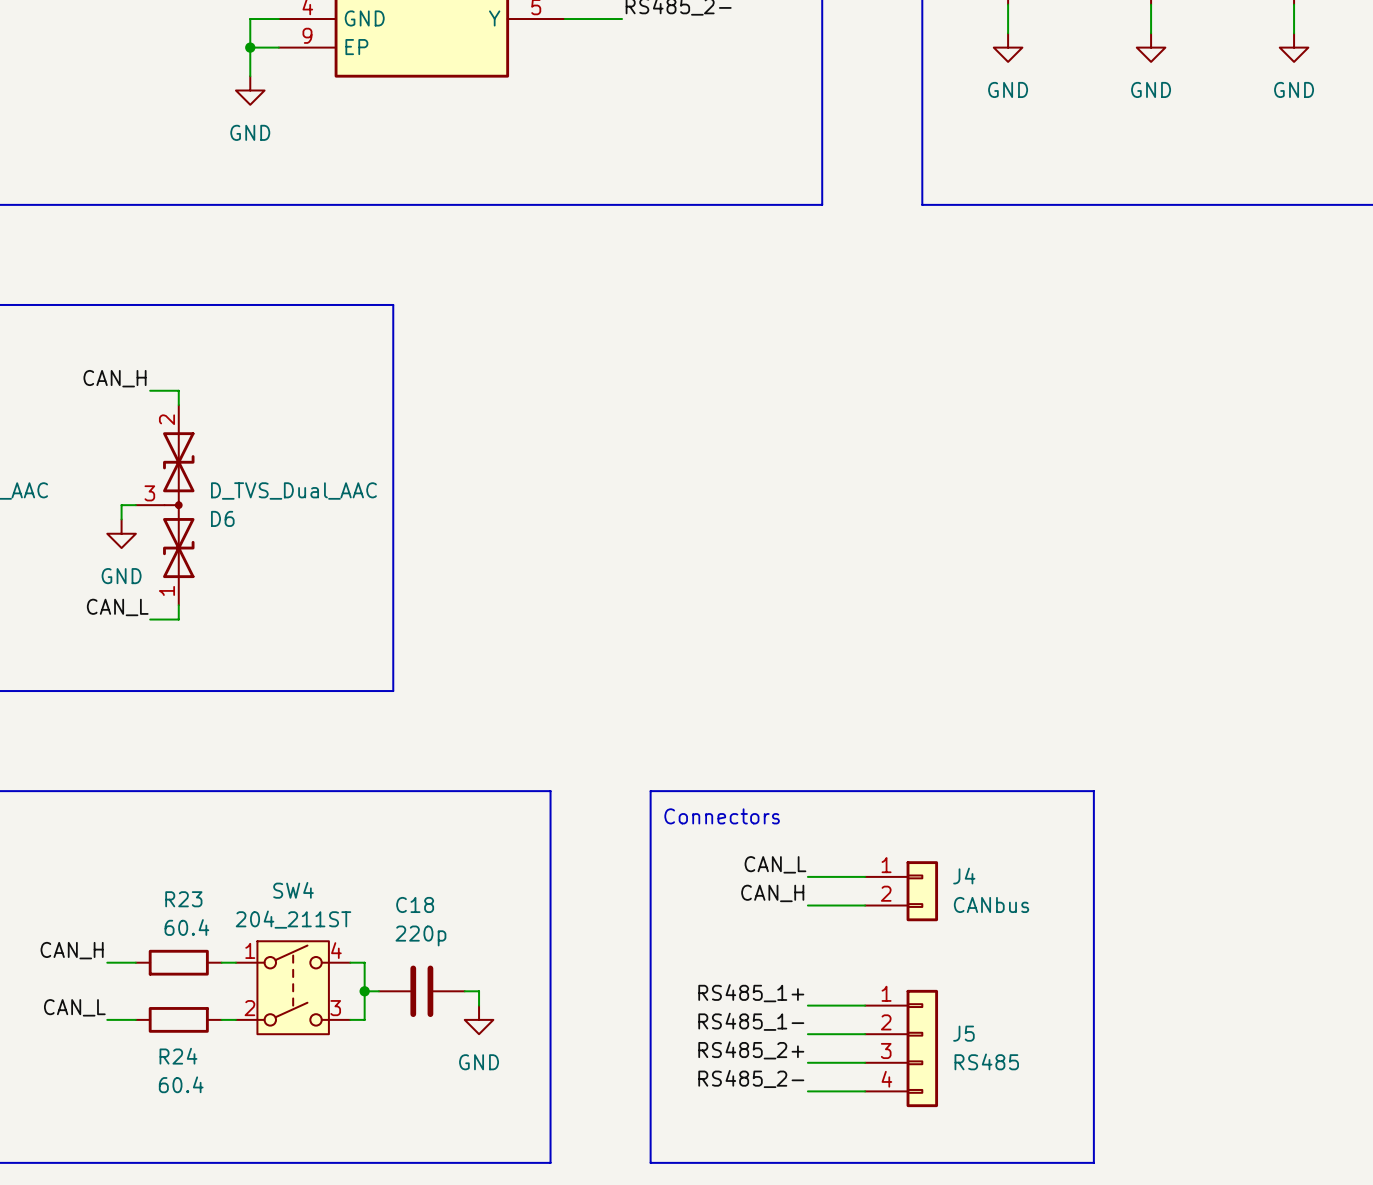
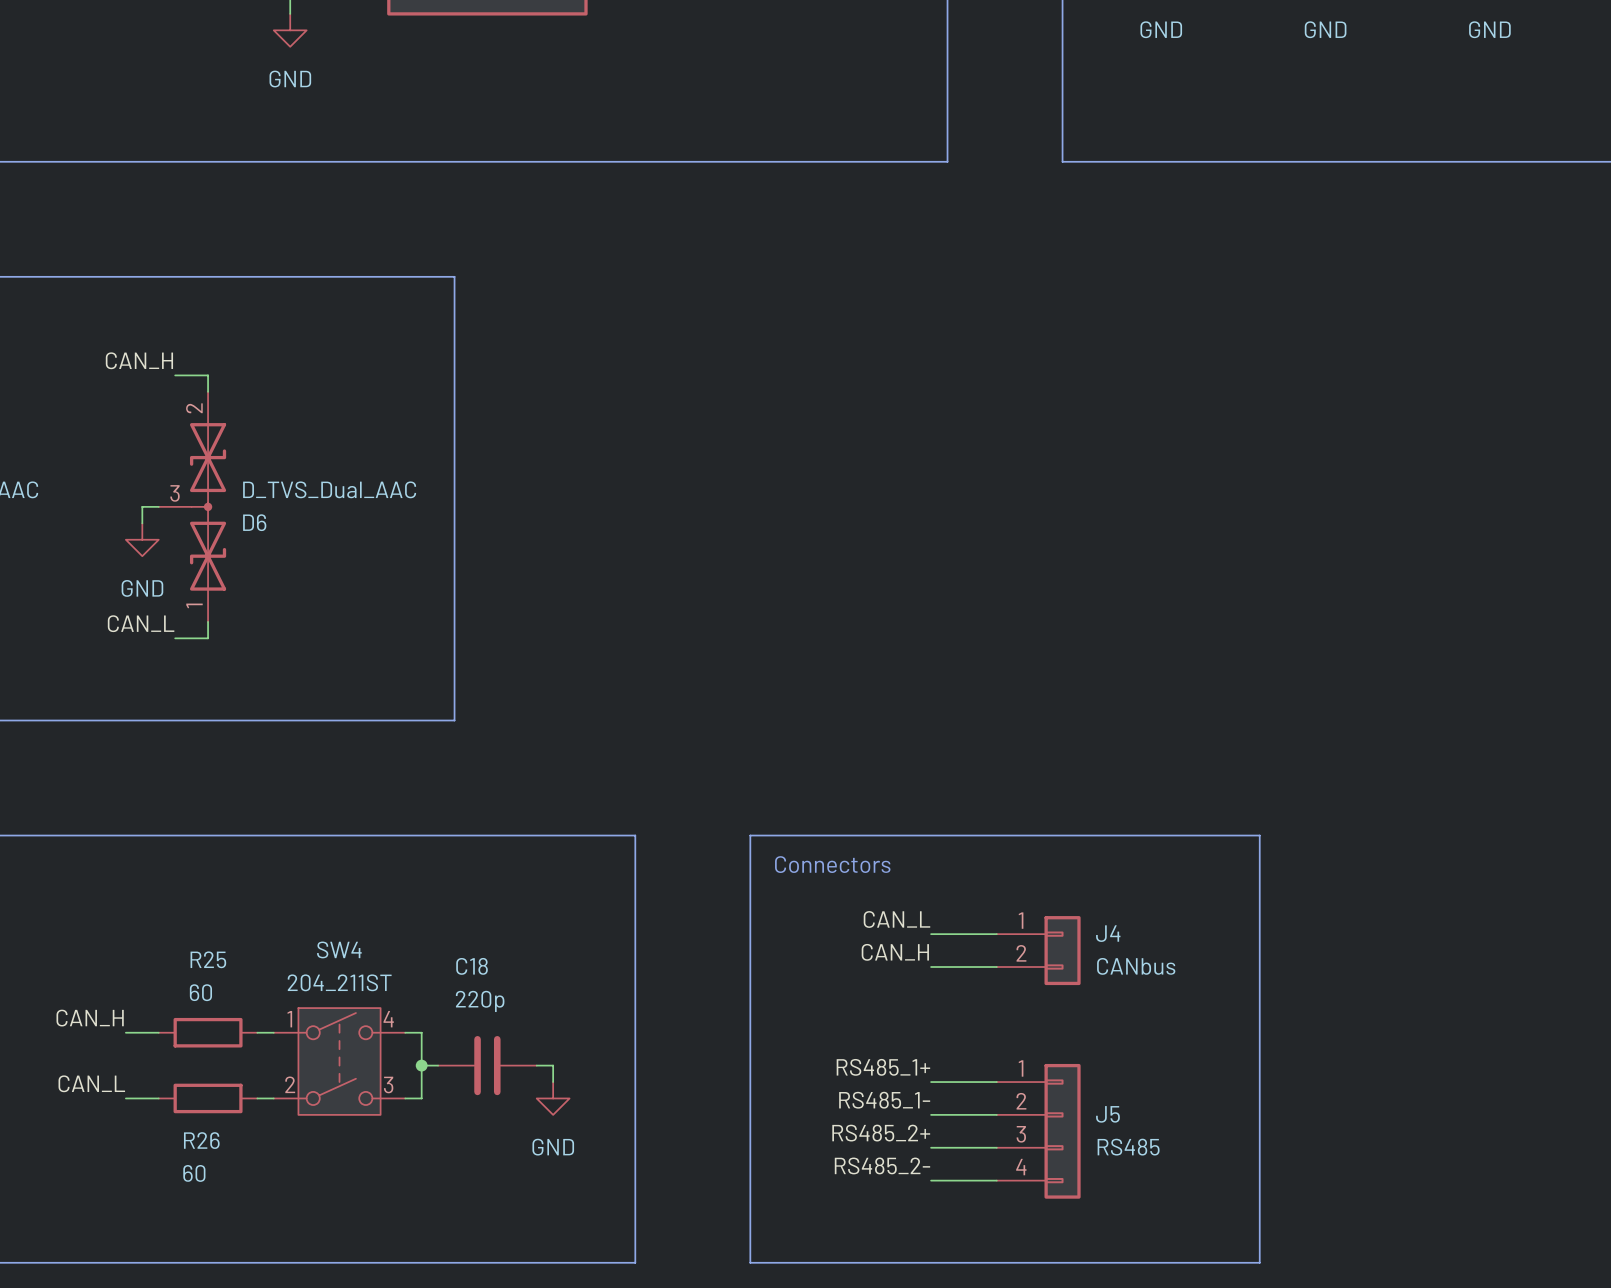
R23 name: R23 (183, 899) -> R25 (208, 959)
R23 value: 60.4 (186, 927) -> 60 (200, 992)
R24 name: R24 (178, 1056) -> R26 (201, 1140)
R24 value: 60.4 (181, 1084) -> 60 (194, 1173)

